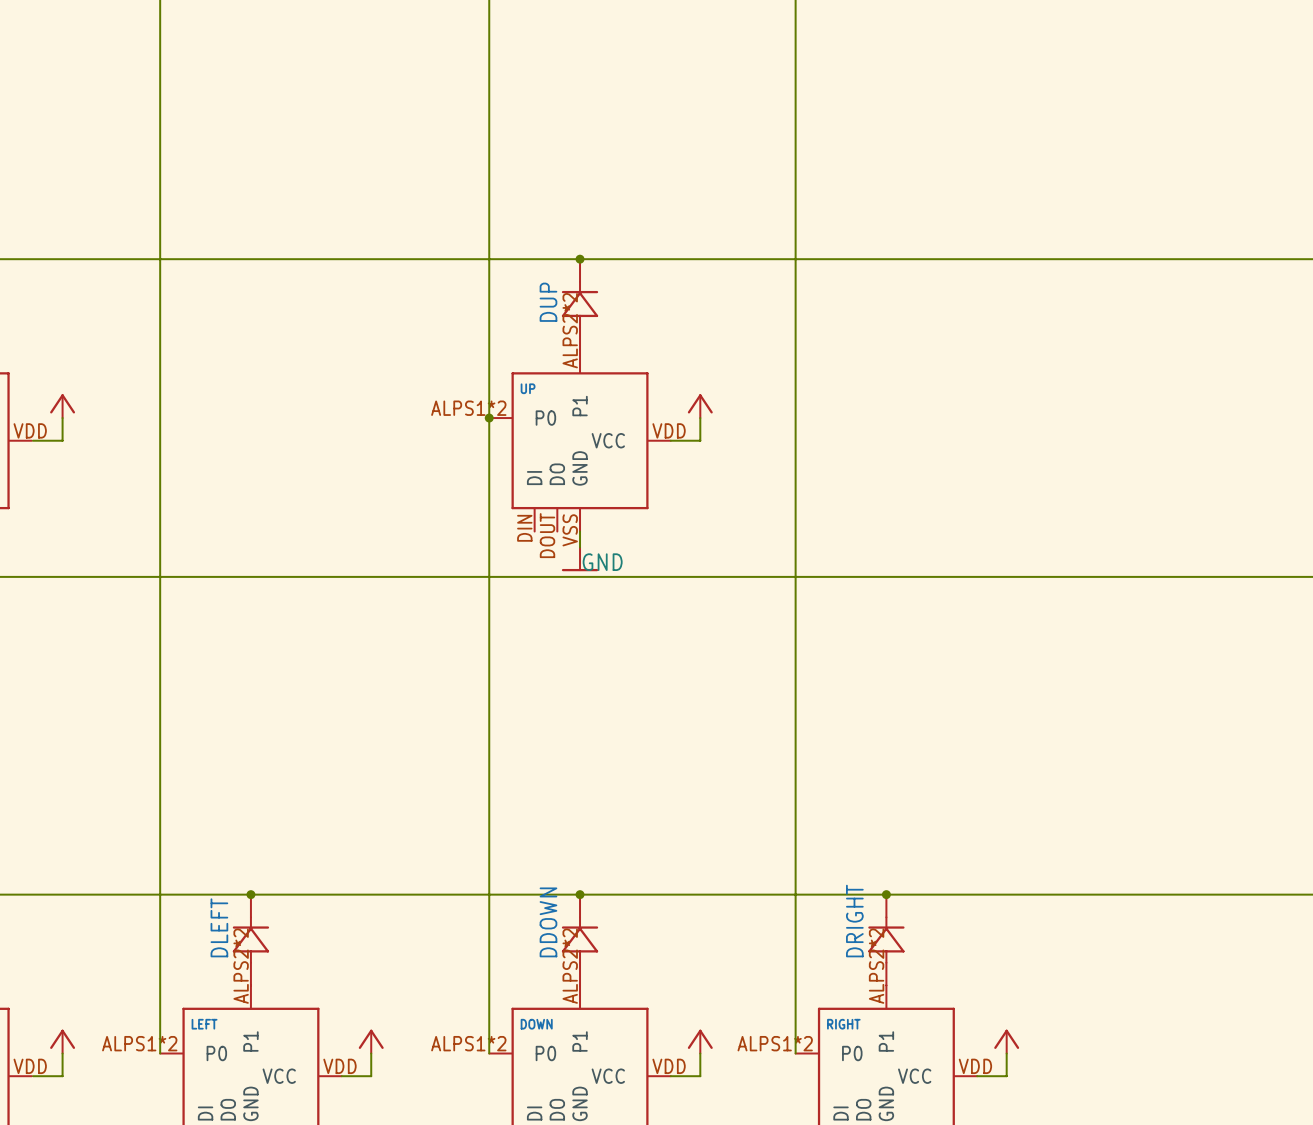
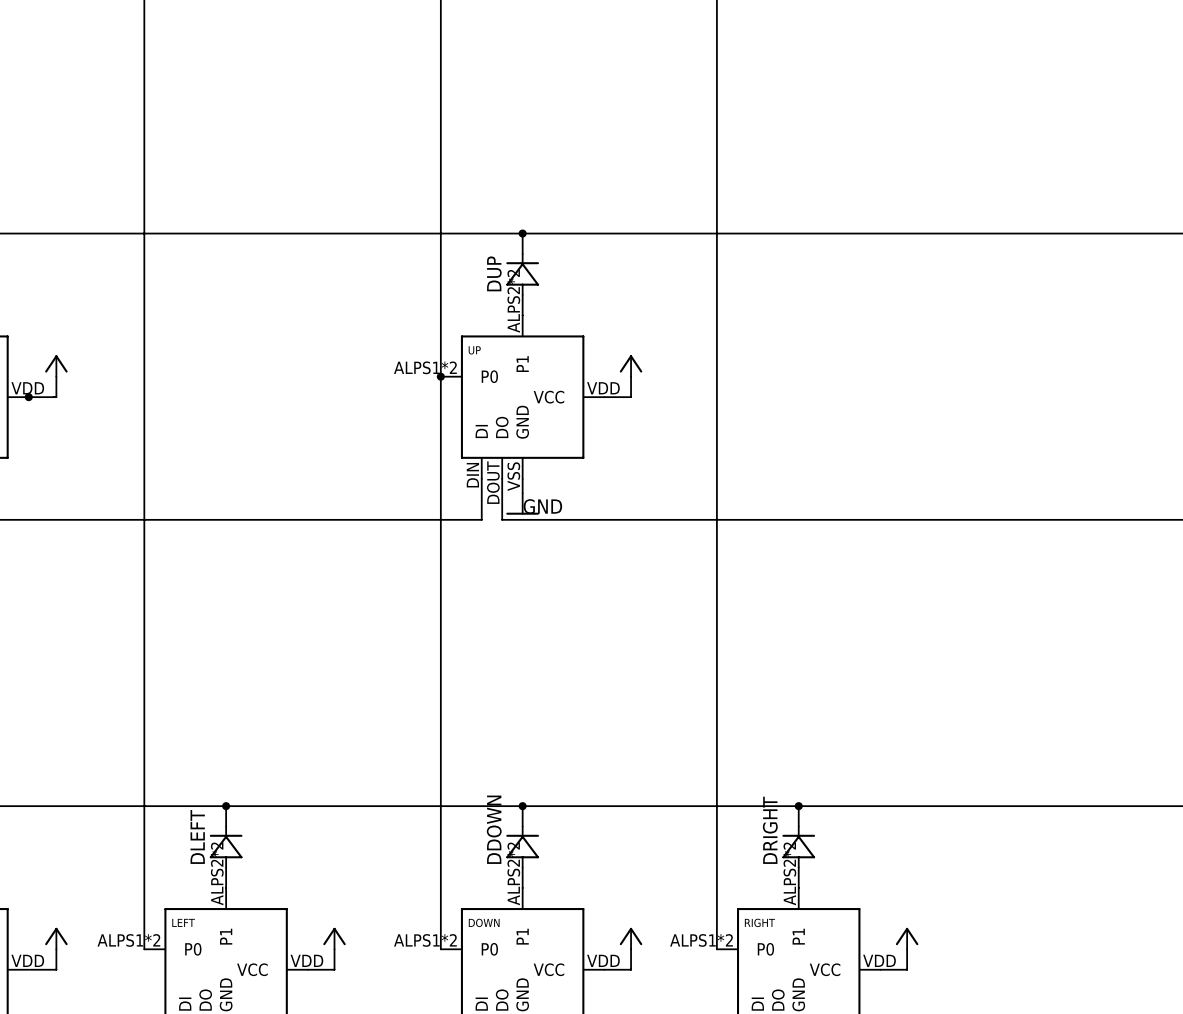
junction: none -> (28, 397)
wire: none -> (502, 478) (502, 519)
wire: (534, 576) (557, 576) -> (481, 519) (481, 478)

